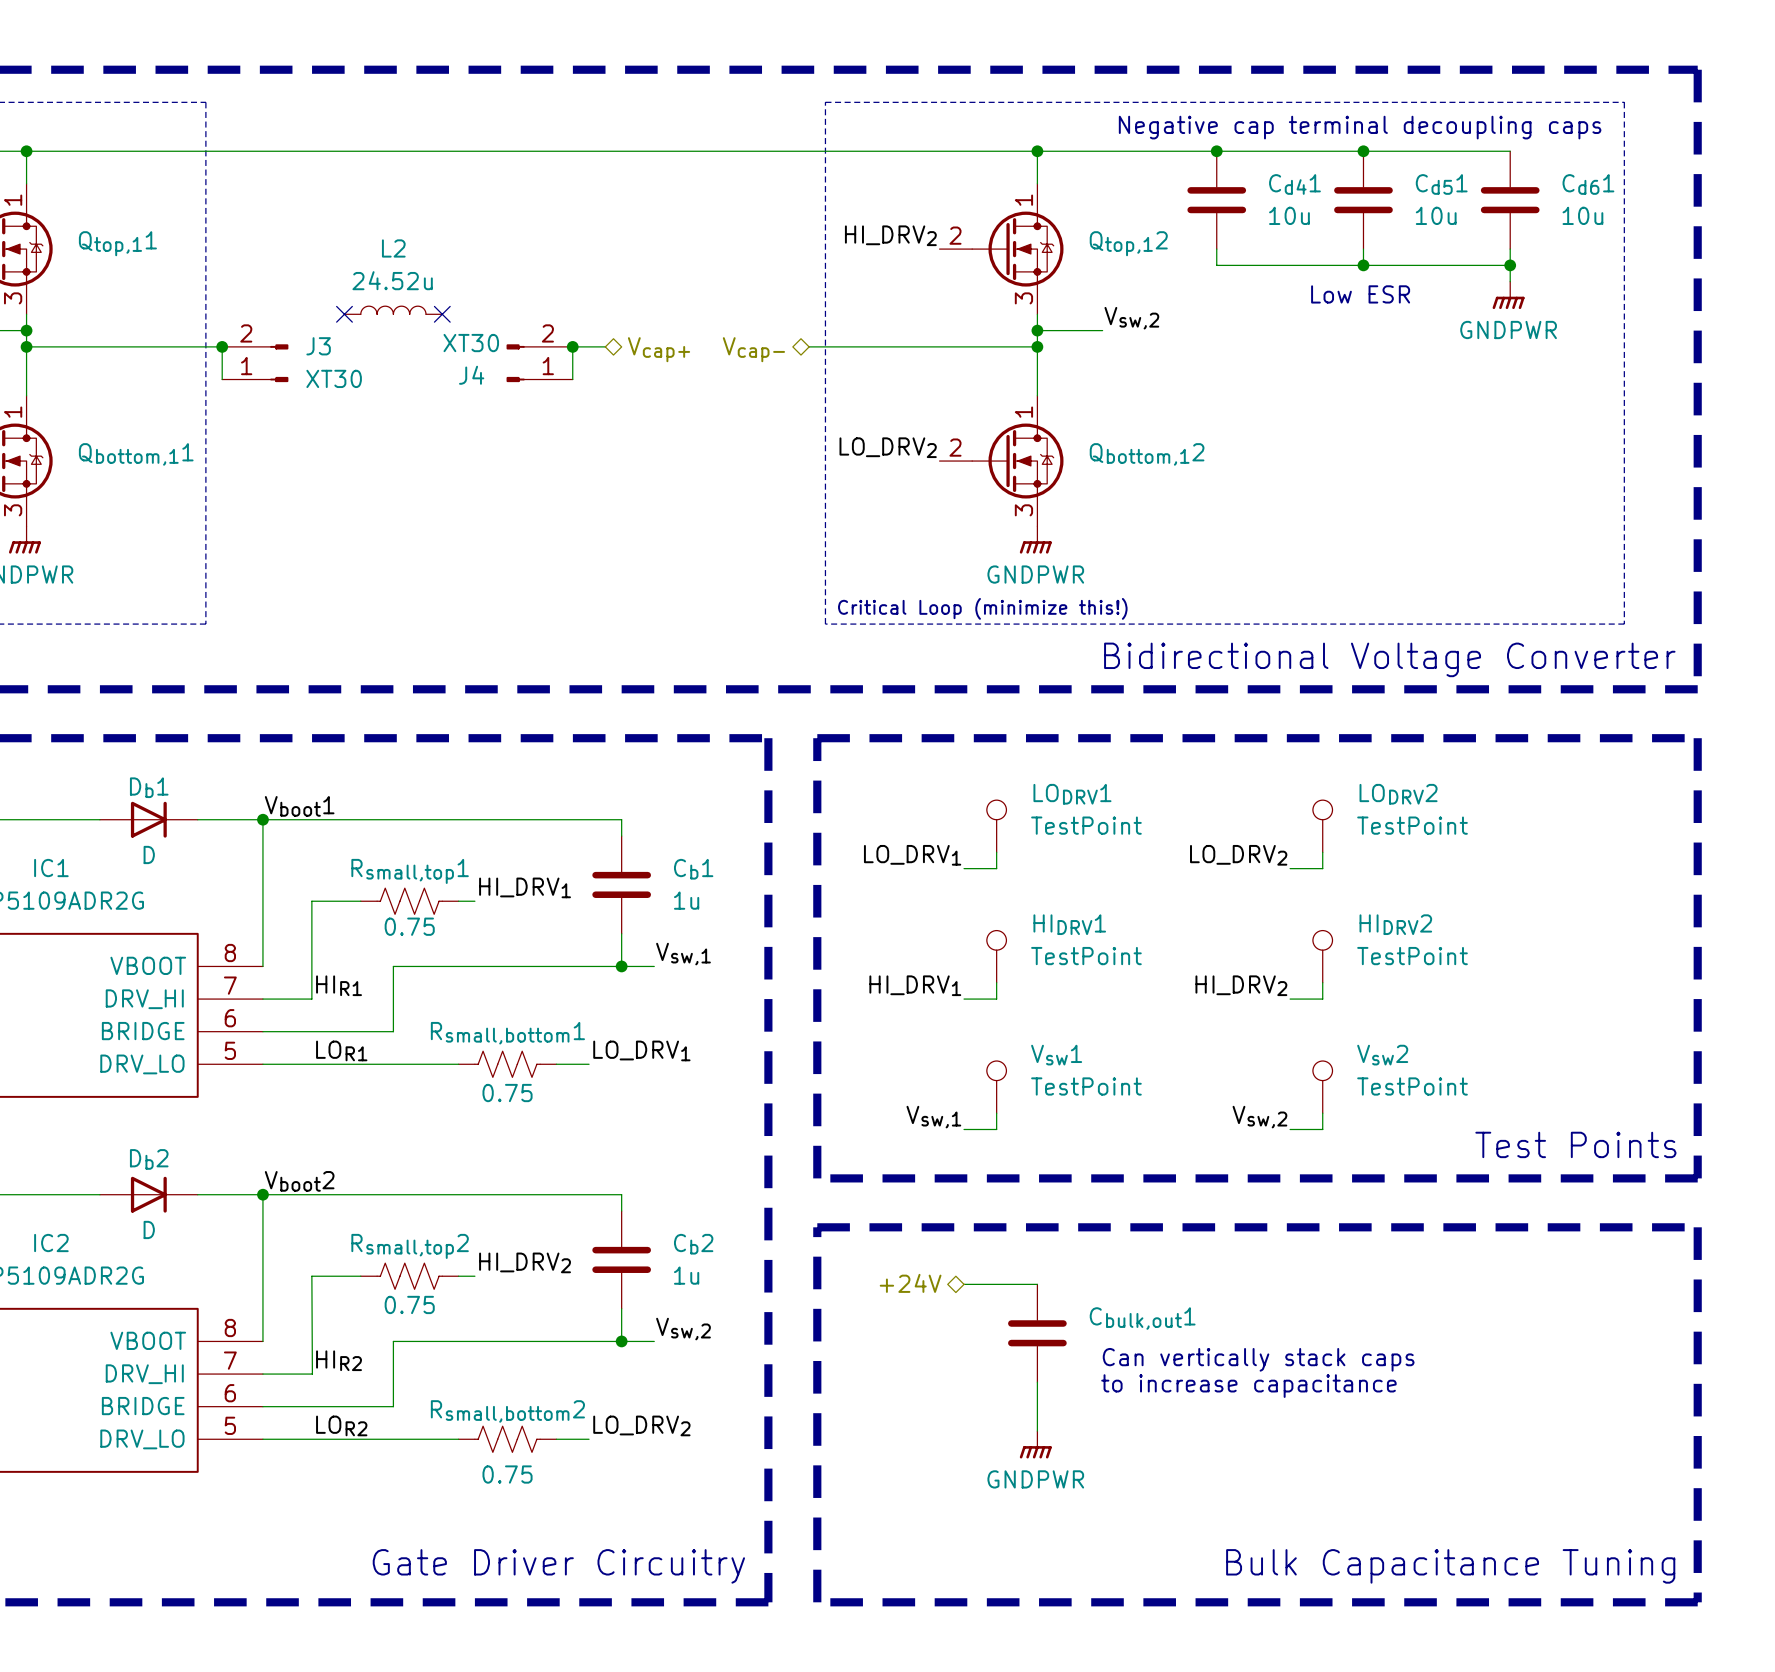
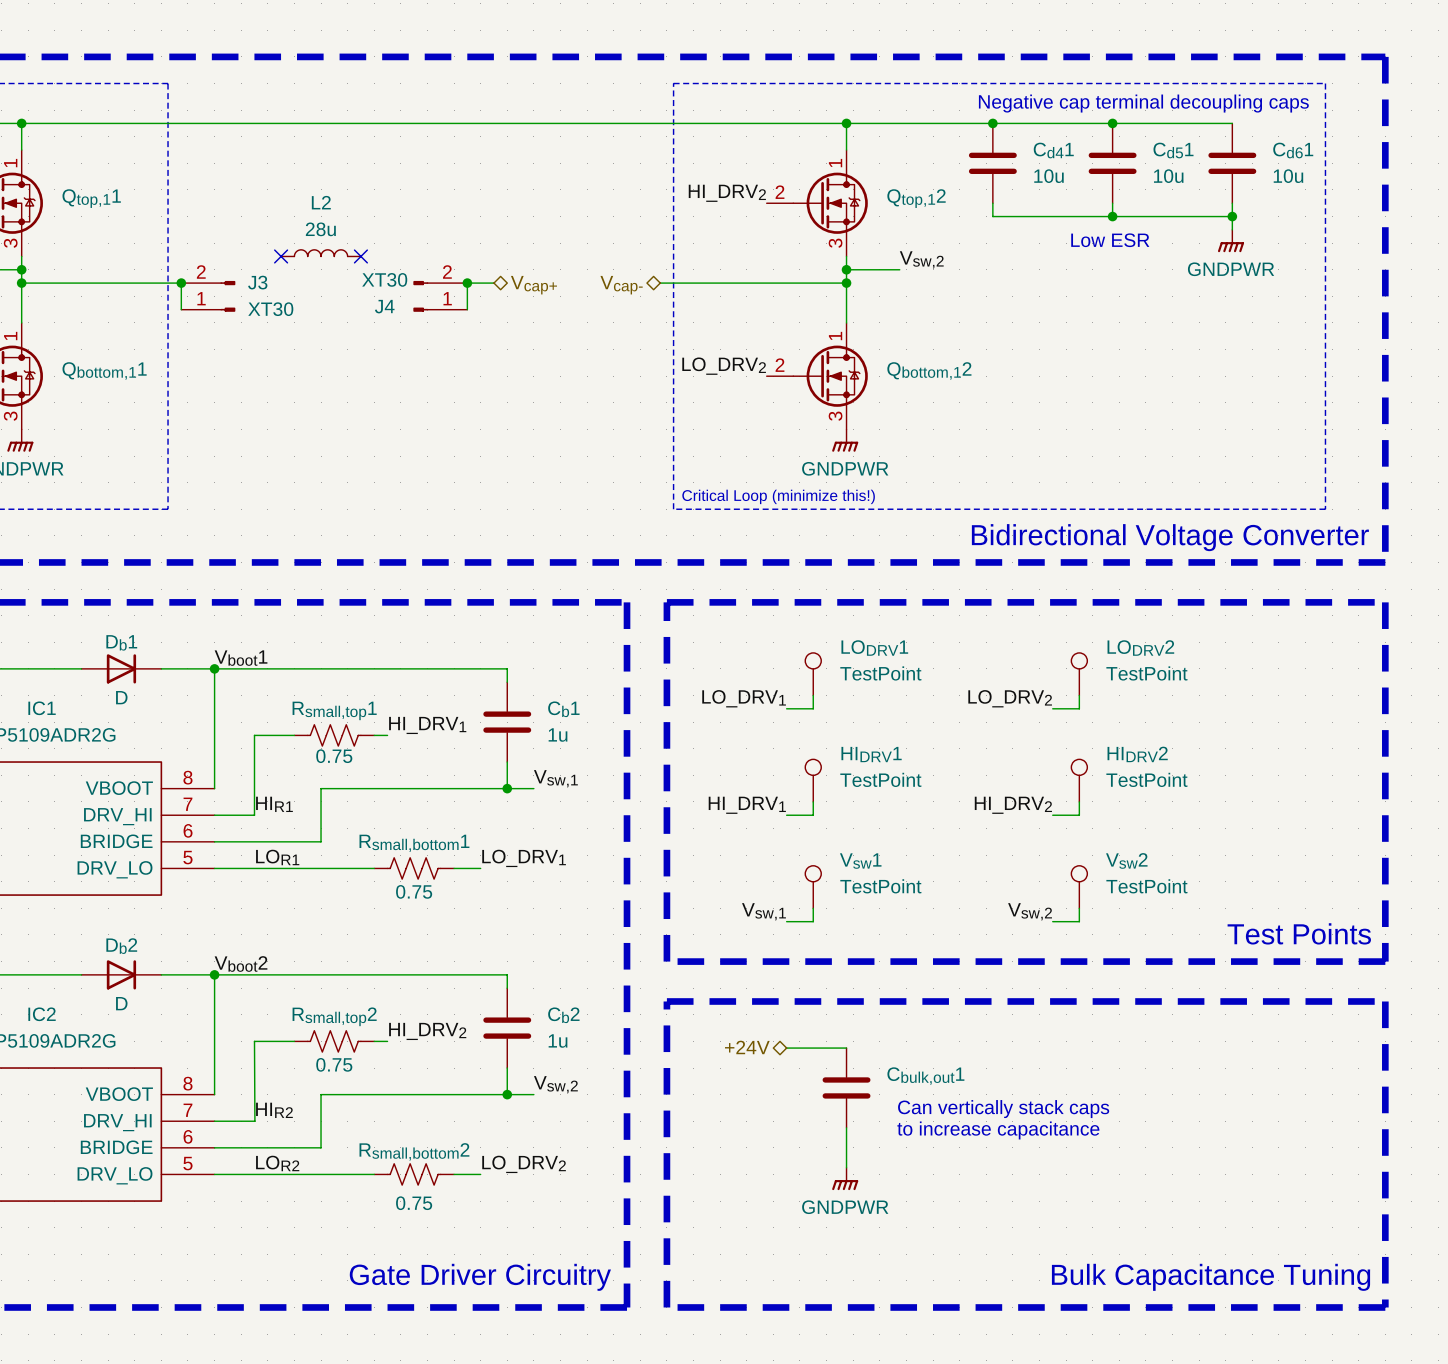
L2 value: 24.52u (392, 280) -> 28u (320, 229)

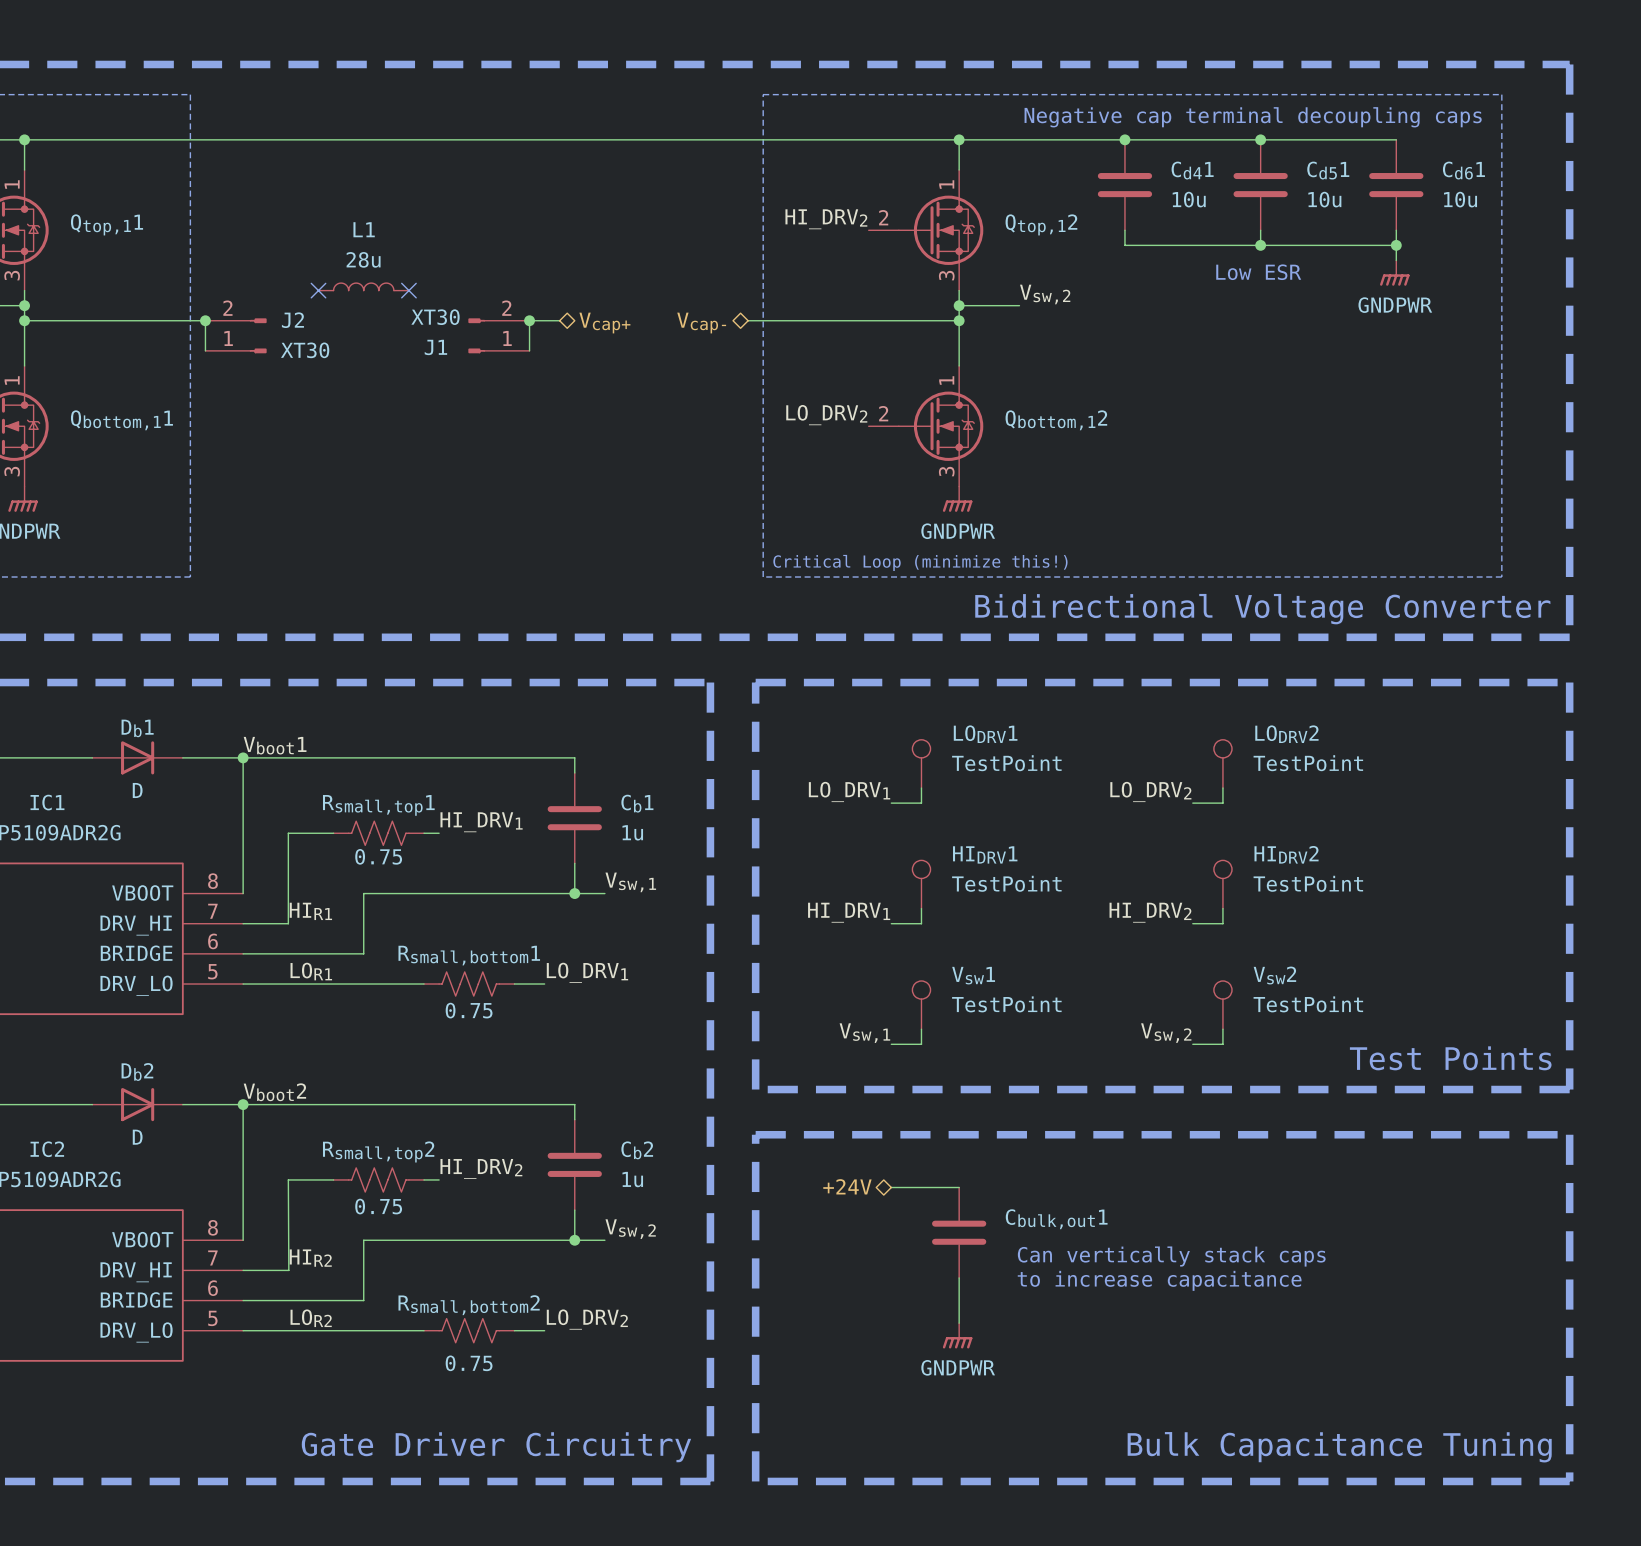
L2 name: L2 (321, 202) -> L1 (364, 229)
J3 name: J3 (257, 282) -> J2 (292, 320)
J4 name: J4 (384, 306) -> J1 (435, 347)

